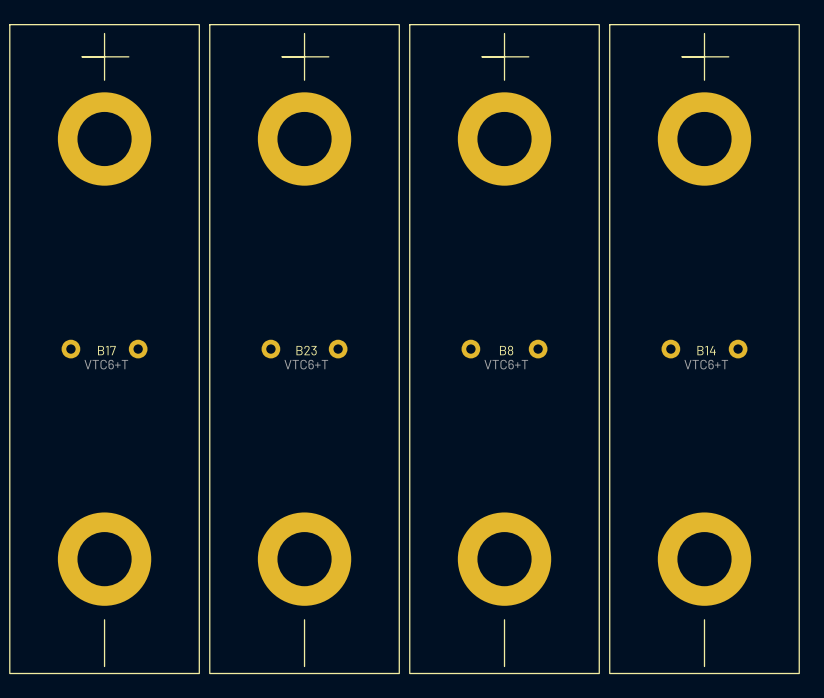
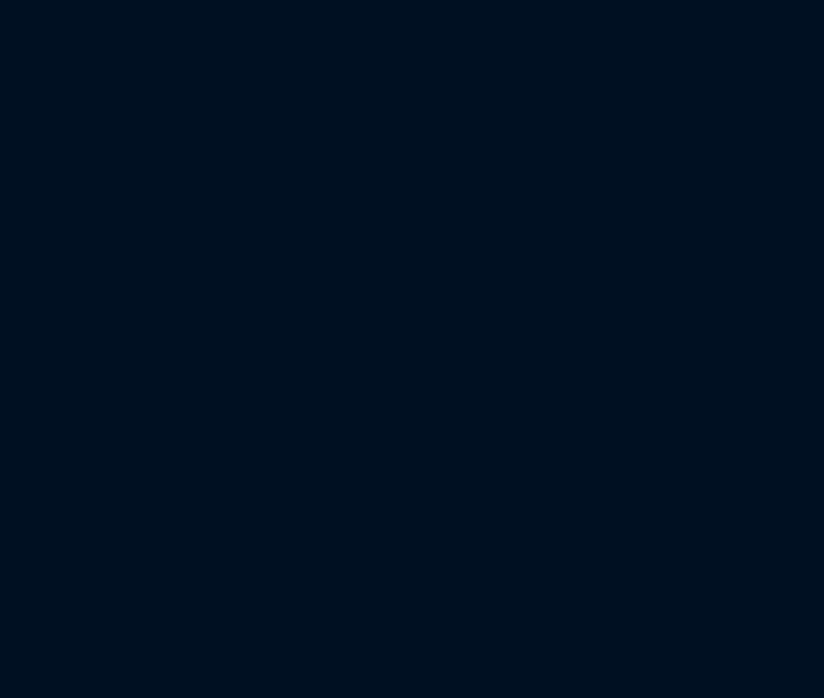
B17: VTC6+T (104, 349) -> none
B23: VTC6+T (304, 349) -> none
B8: VTC6+T (504, 349) -> none
B14: VTC6+T (704, 349) -> none

